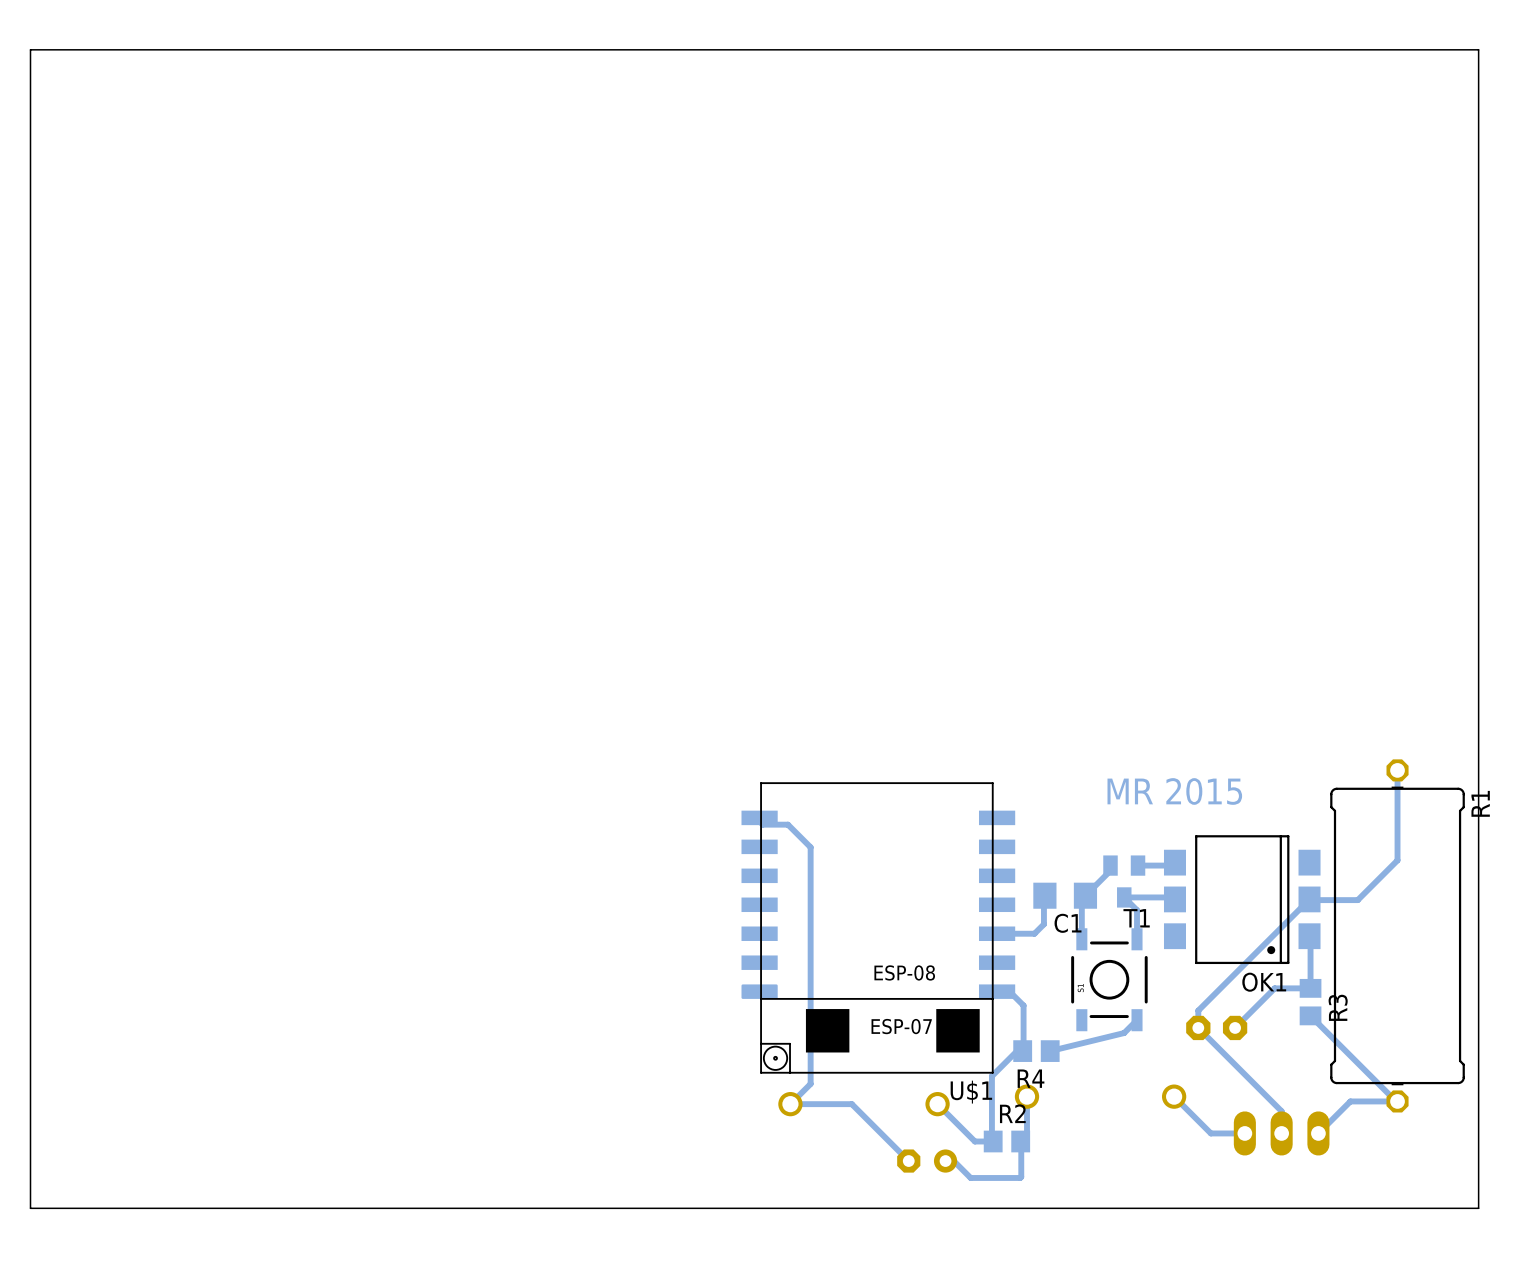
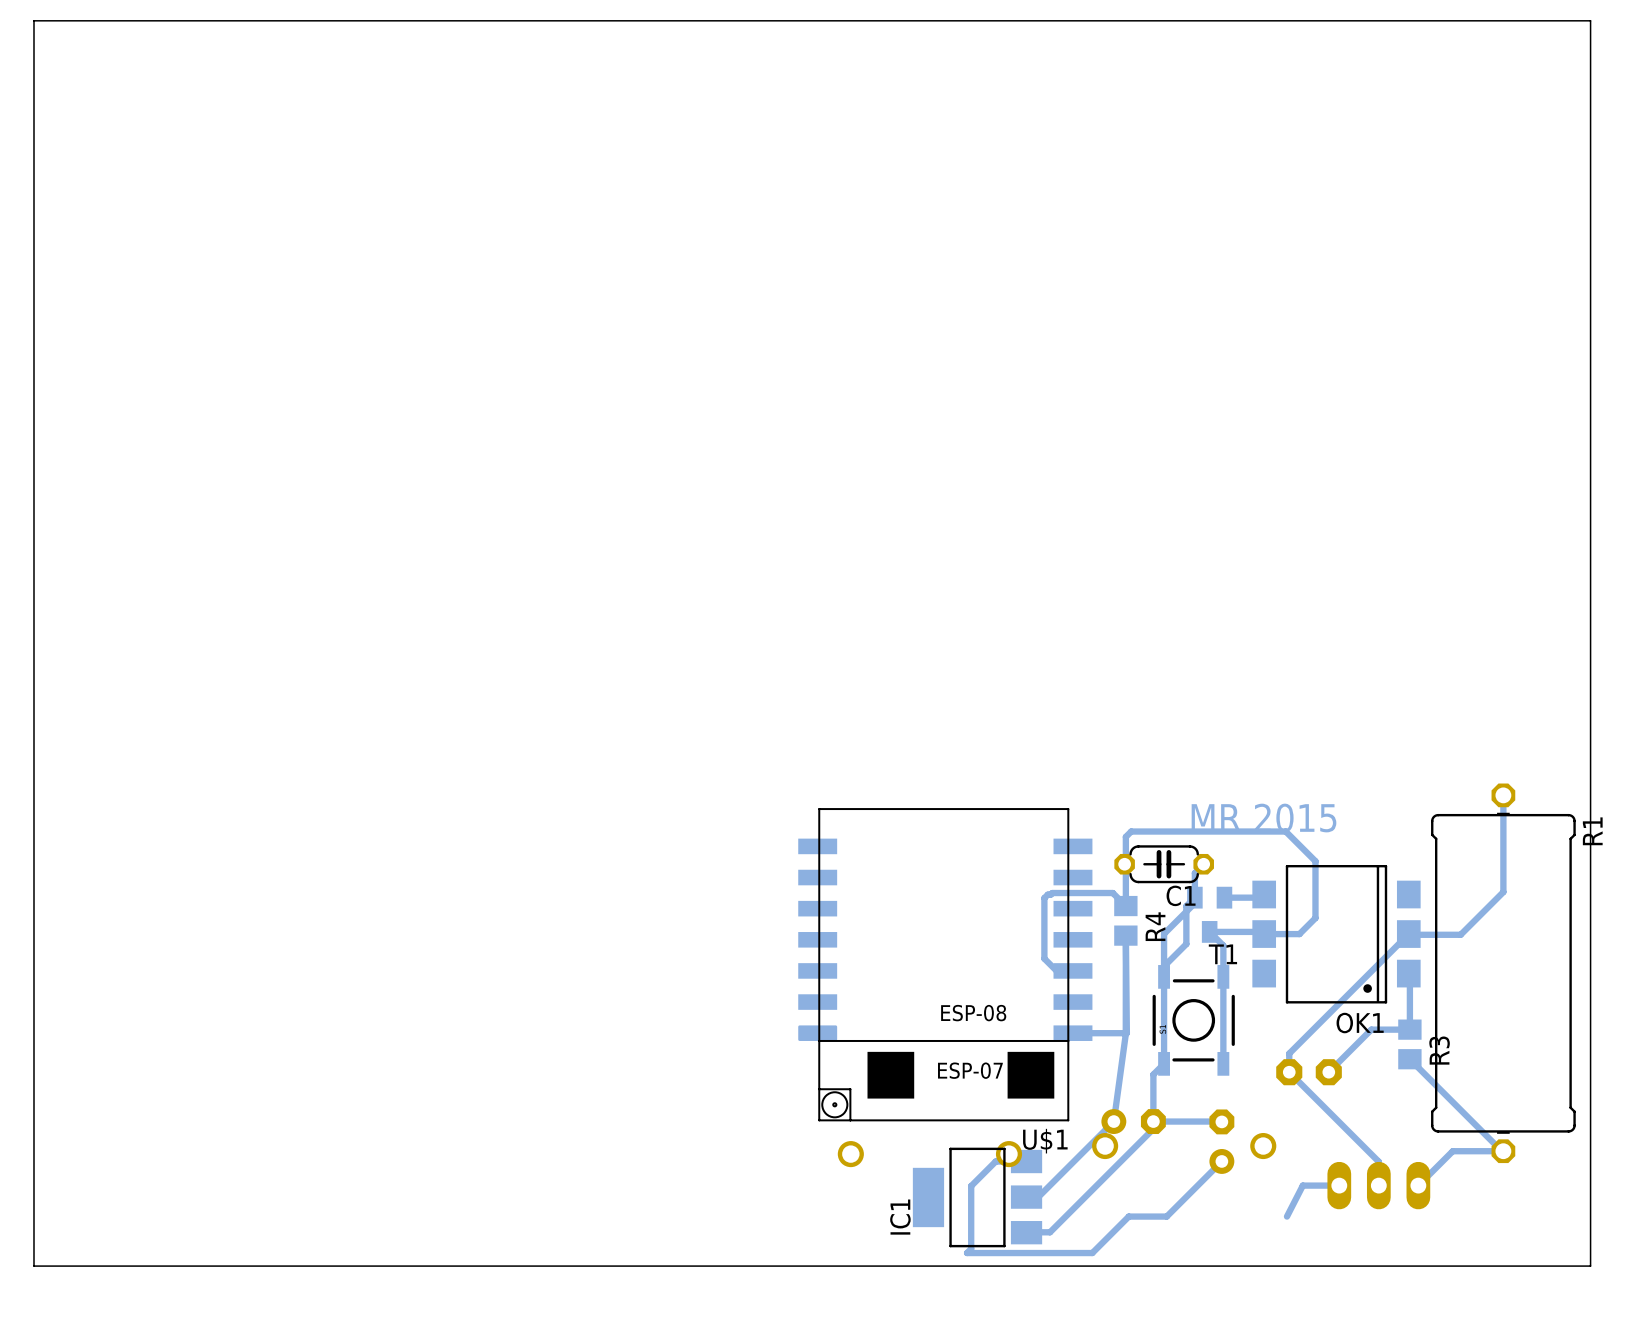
bottom track: (759, 817) (759, 821) (762, 824) (787, 824) (810, 847) (810, 1083) (790, 1104) (851, 1104) (908, 1161) -> none
bottom track: none -> (1203, 864) (1194, 873) (1194, 897) (1186, 906) (1186, 944) (1164, 966)
C1 footprint: [1033, 882, 1098, 909] -> [1114, 845, 1214, 884]
bottom track: (1044, 895) (1043, 924) (1034, 933) (1005, 933) -> none
bottom track: none -> (1264, 934) (1299, 934) (1315, 918) (1315, 861) (1285, 831) (1131, 831) (1125, 836) (1125, 906) (1112, 893) (1052, 893) (1044, 898) (1044, 958) (1056, 970) (1072, 970)
bottom track: none -> (1164, 976) (1164, 1063) (1153, 1074) (1153, 1128) (1050, 1232) (1026, 1232)
bottom track: (1009, 991) (1023, 1005) (1023, 1044) (991, 1076) (993, 1141) (974, 1141) (937, 1104) -> (1086, 1033) (1126, 1033) (1125, 935) (1125, 1034) (1113, 1121) (1038, 1197) (1026, 1197)
bottom track: (1137, 1020) (1124, 1033) (1050, 1051) -> (1223, 1063) (1223, 976)
R4 rotation: 0° (1036, 1051) -> 90° clockwise (1125, 920)
R4 position: (1036, 1051) -> (1125, 920)
part: none -> (1133, 1121)
bottom track: none -> (1153, 1121) (1221, 1121)
R4 name position: R4 (1031, 1078) -> R4 (1155, 926)
part: none -> (1221, 1141)
bottom track: (1027, 1096) (1027, 1135) (1020, 1141) (1020, 1177) (970, 1177) (953, 1161) (945, 1161) -> none
bottom track: (1174, 1096) (1210, 1133) -> (1286, 1216) (1302, 1185)
bottom track: none -> (1221, 1161) (1166, 1216) (1128, 1216) (1092, 1253) (967, 1253) (971, 1248) (971, 1186) (995, 1161) (1026, 1161)
R2: (1006, 1141) -> none
IC1: none -> (977, 1197)
part: (927, 1161) -> none

